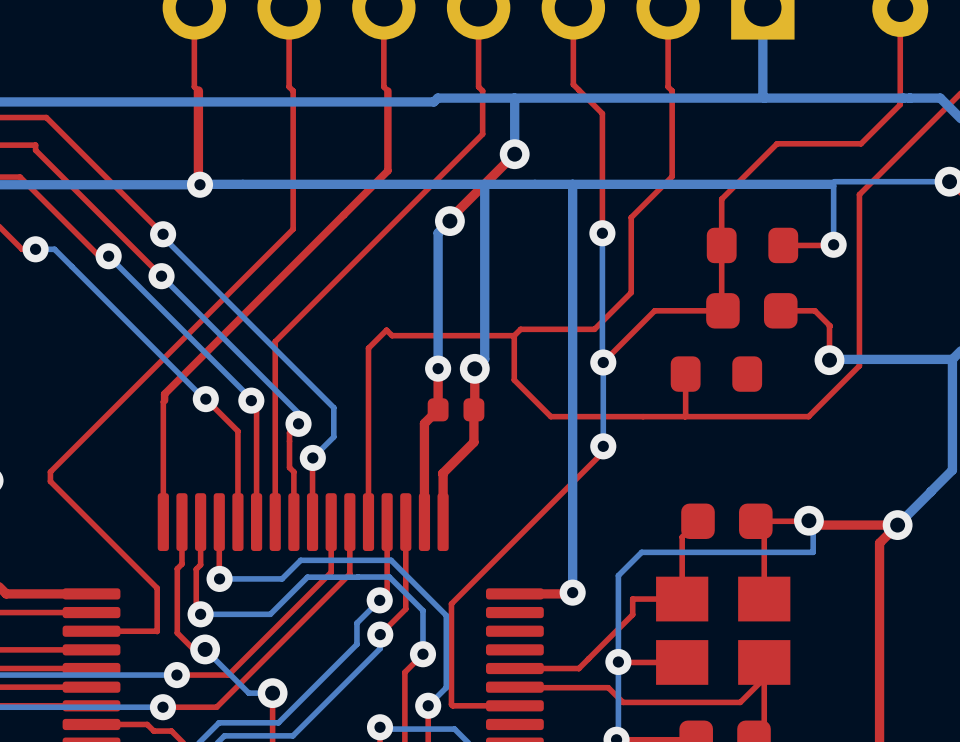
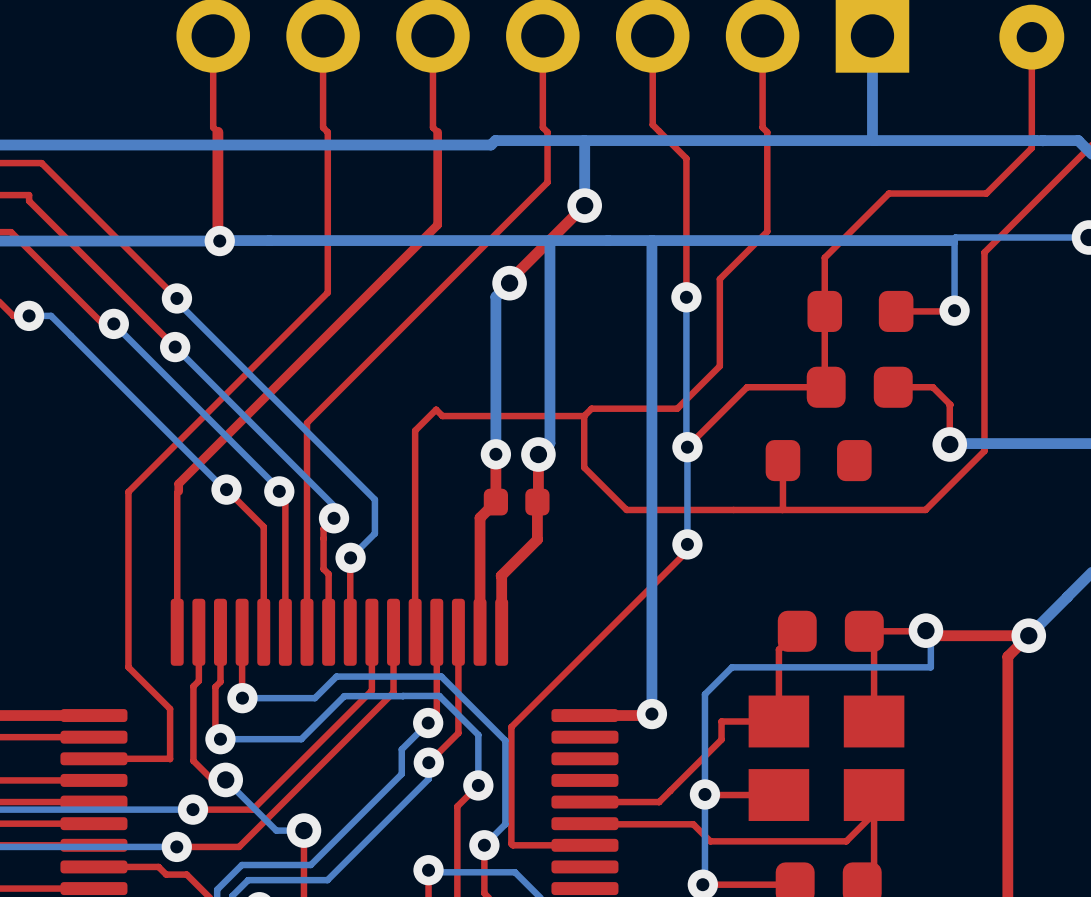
top track: (121, 401) (50, 471) (50, 481) (121, 552) -> (128, 491) (128, 667)

